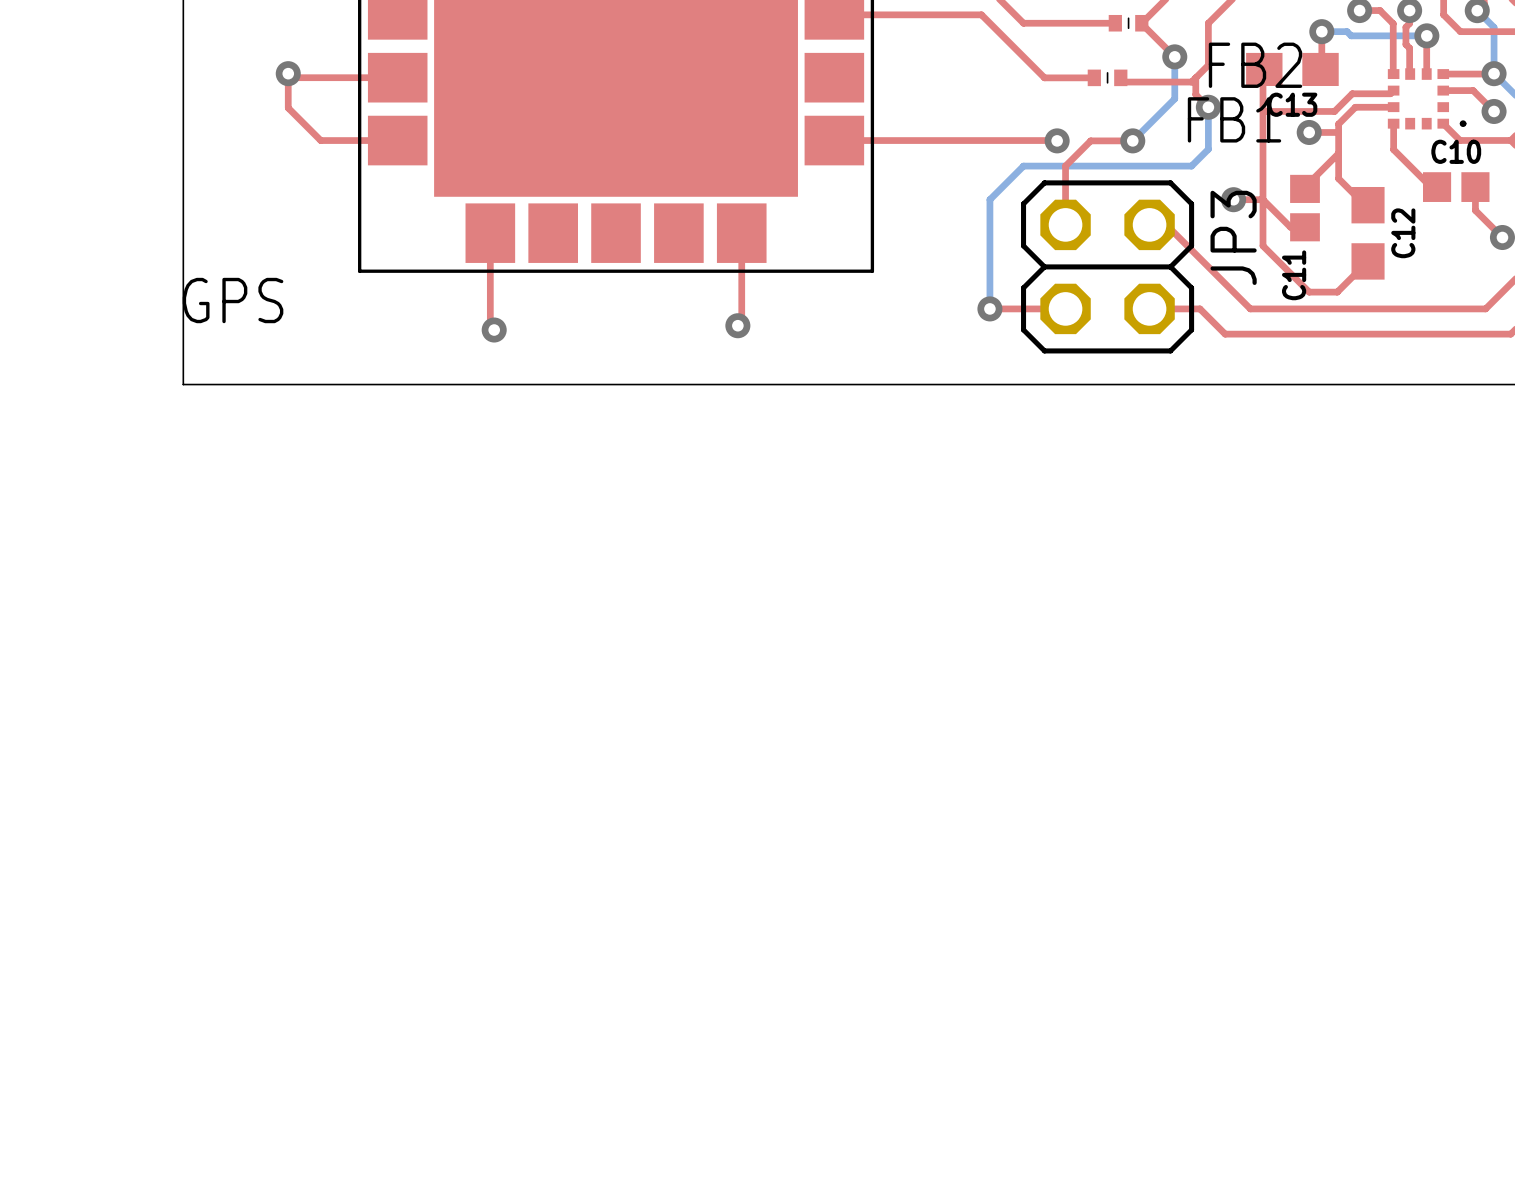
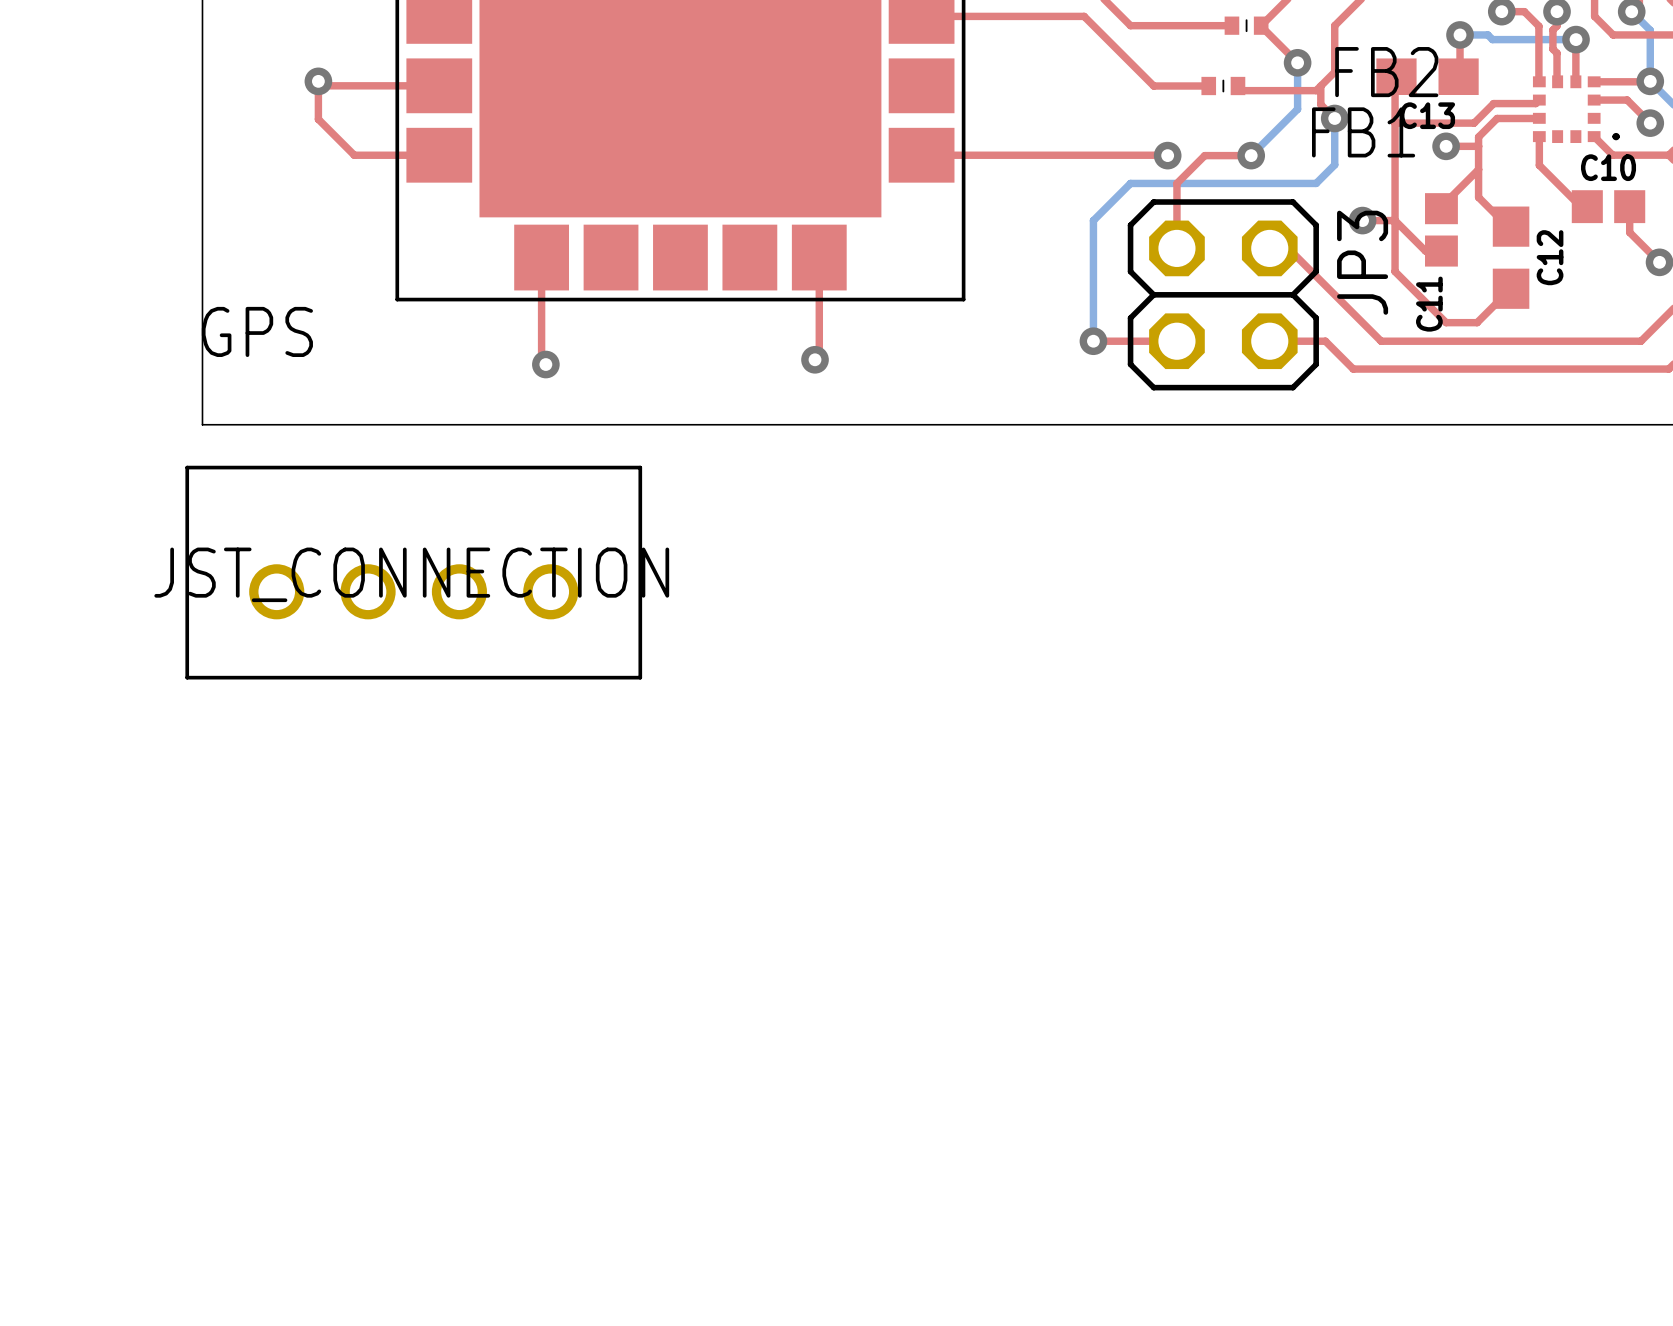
JST_CONNECTION: none -> (413, 572)

